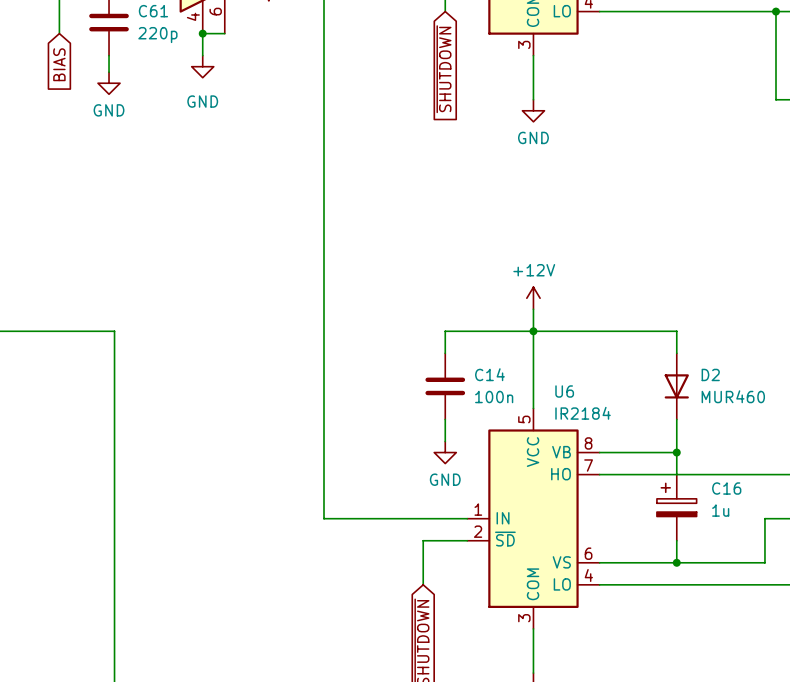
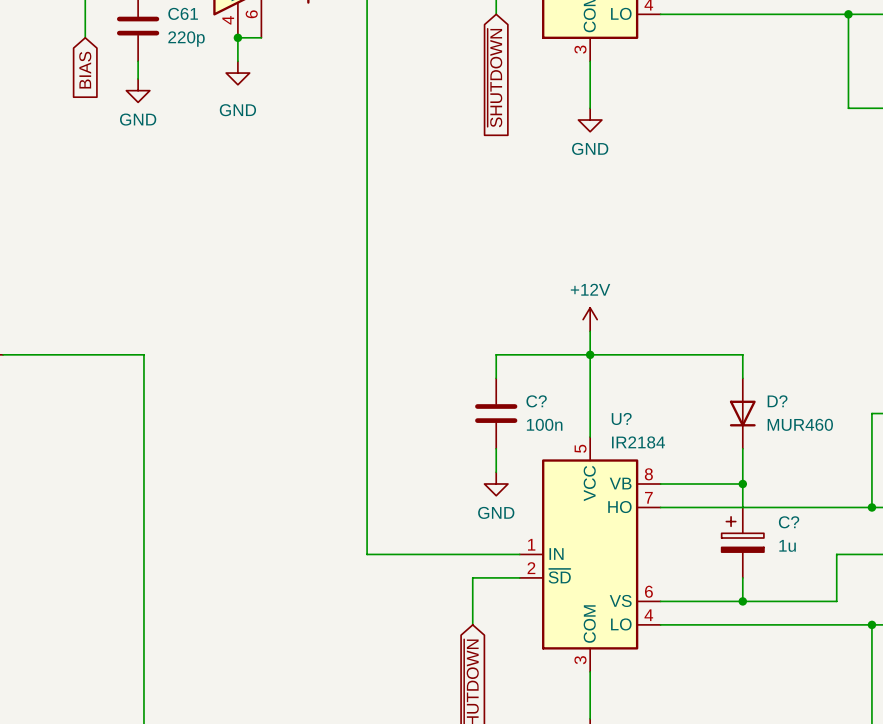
C14 name: C14 (489, 374) -> C? (536, 401)
D2 name: D2 (710, 374) -> D? (777, 401)
U6 name: U6 (564, 391) -> U? (621, 418)
C16 name: C16 (726, 488) -> C? (789, 522)

